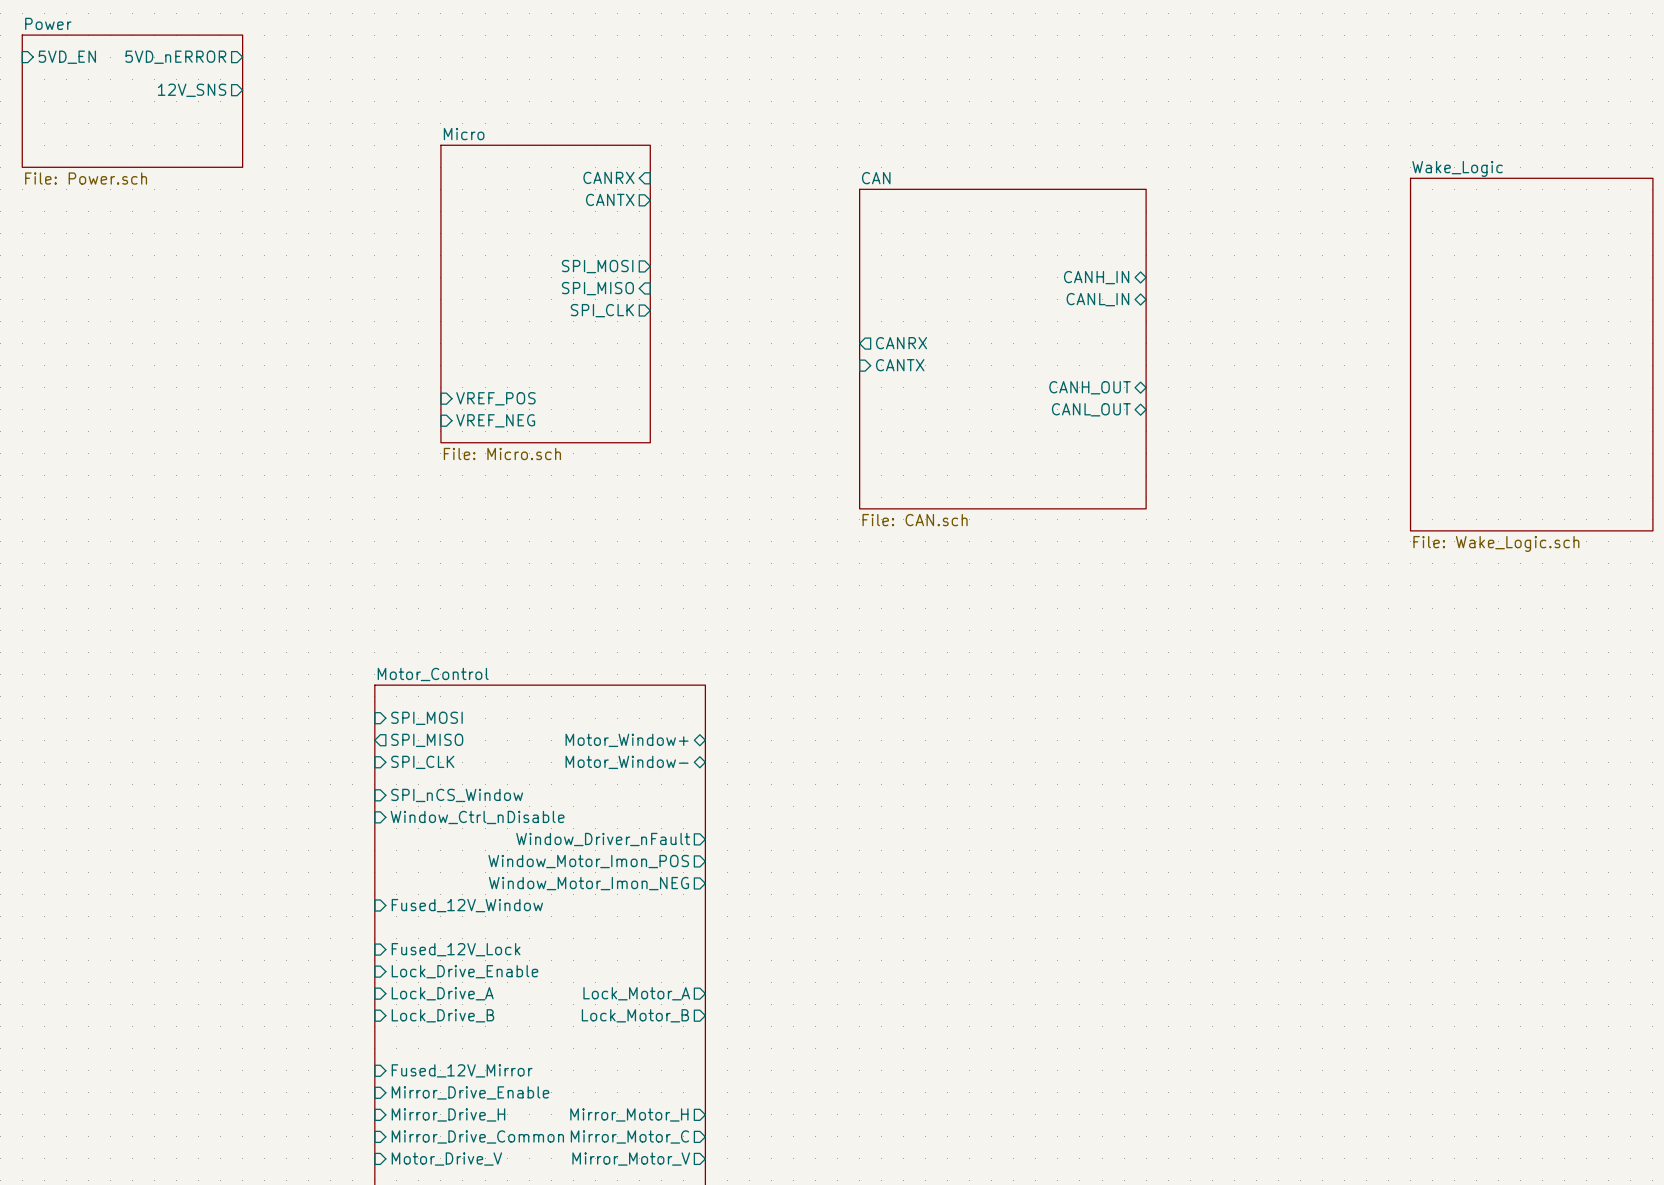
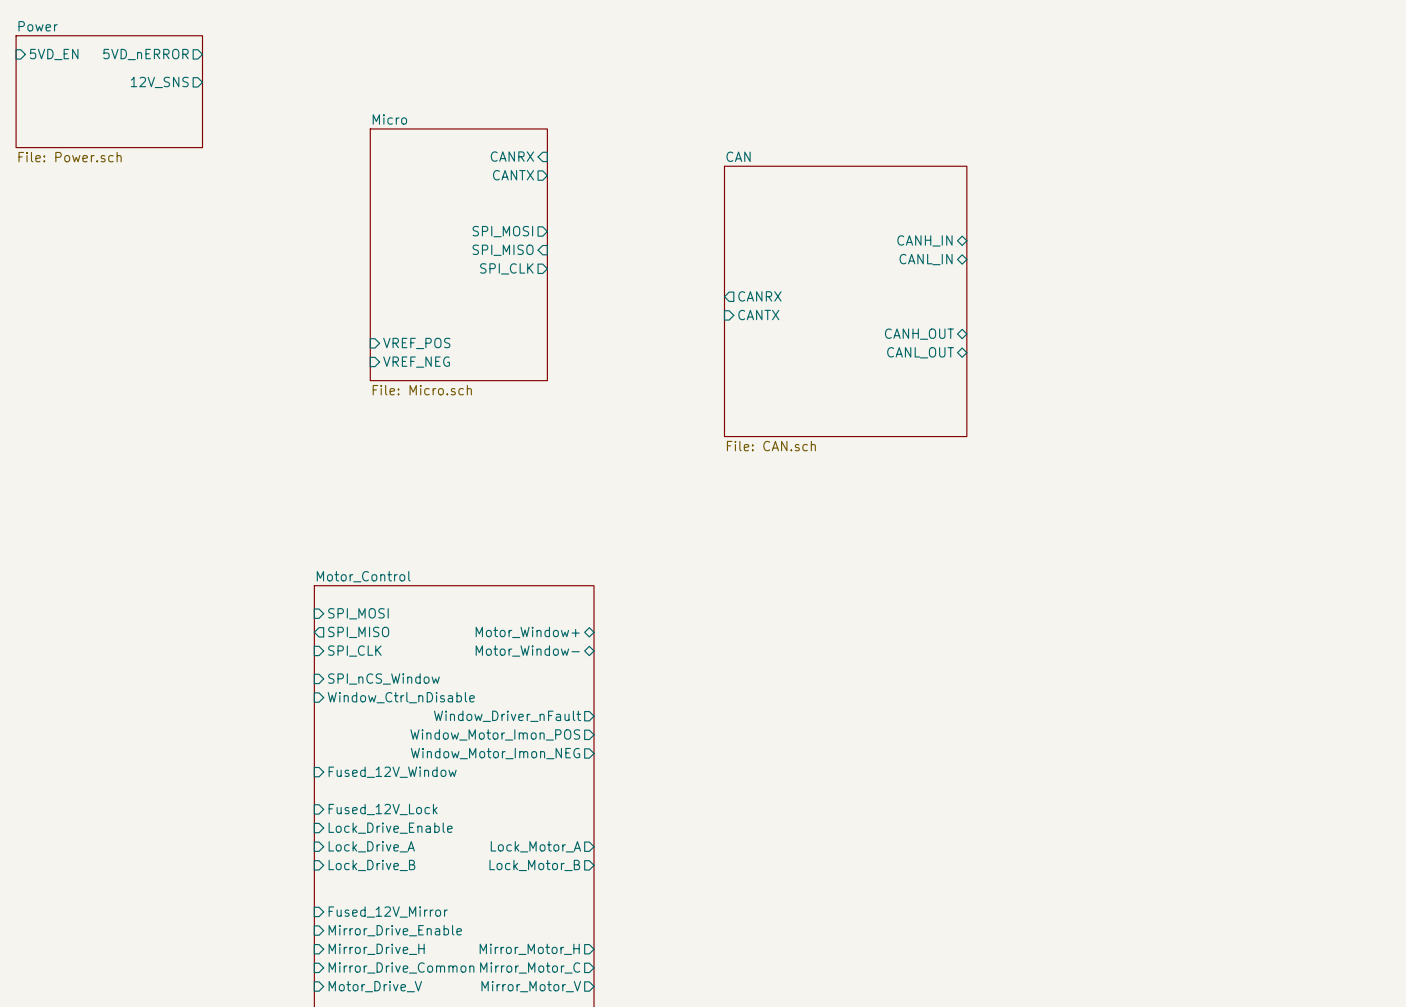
sheet Wake_Logic: File: Wake_Logic.sch (1531, 354) -> none

